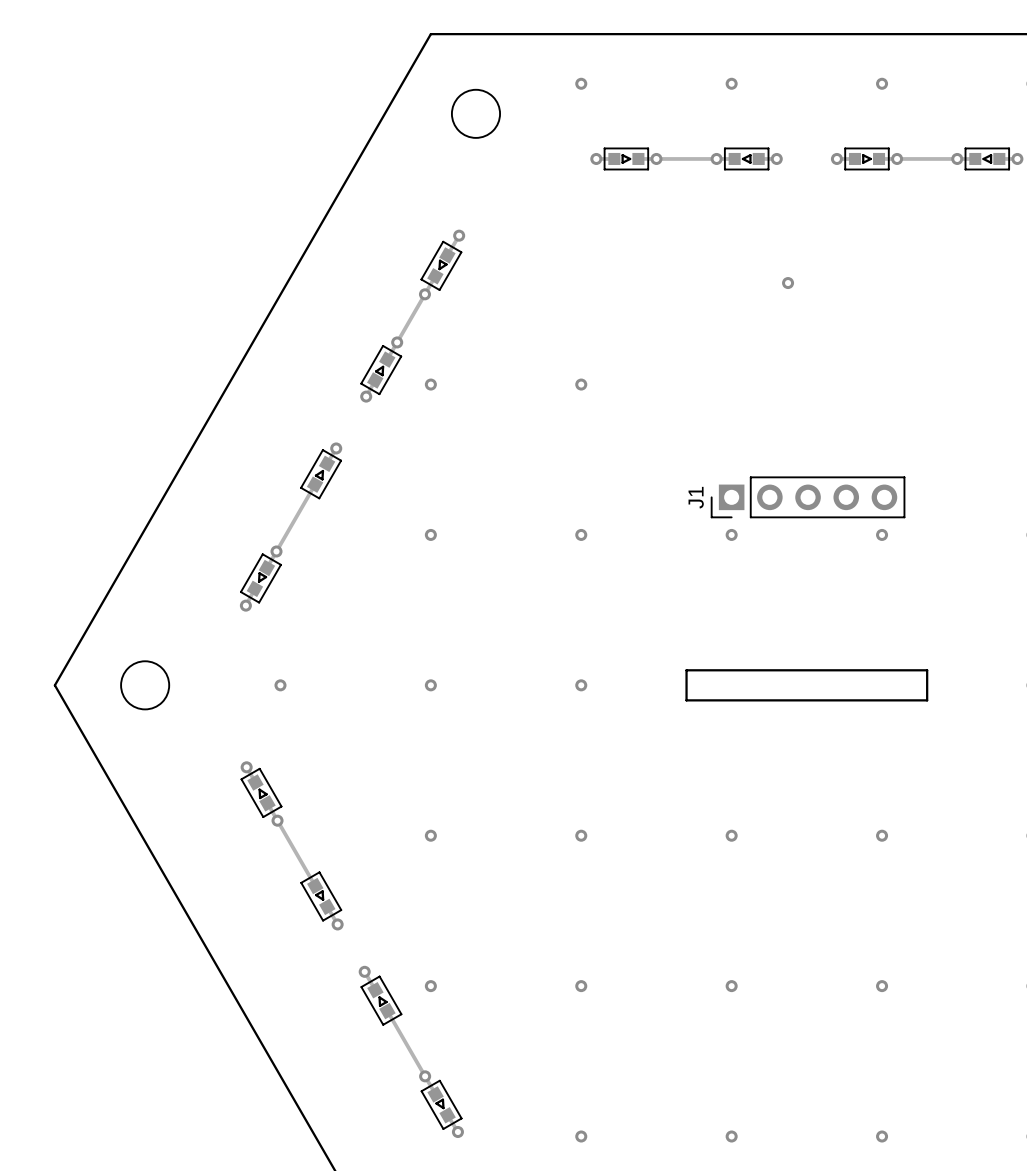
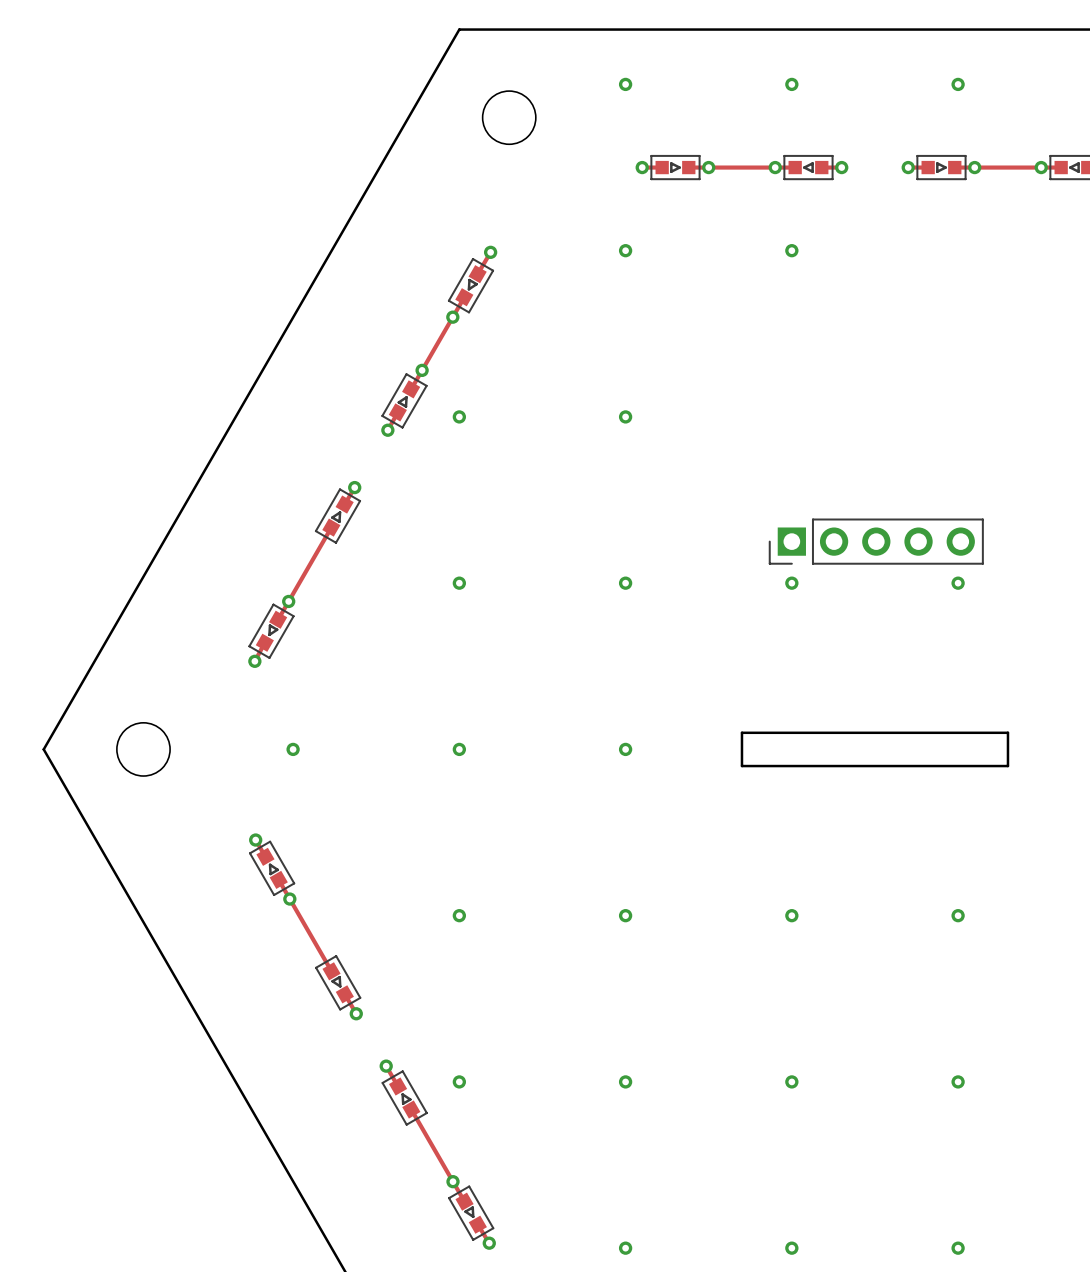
via: none -> (625, 250)
via position: (788, 283) -> (791, 250)
J1 name: J1 (696, 497) -> none

